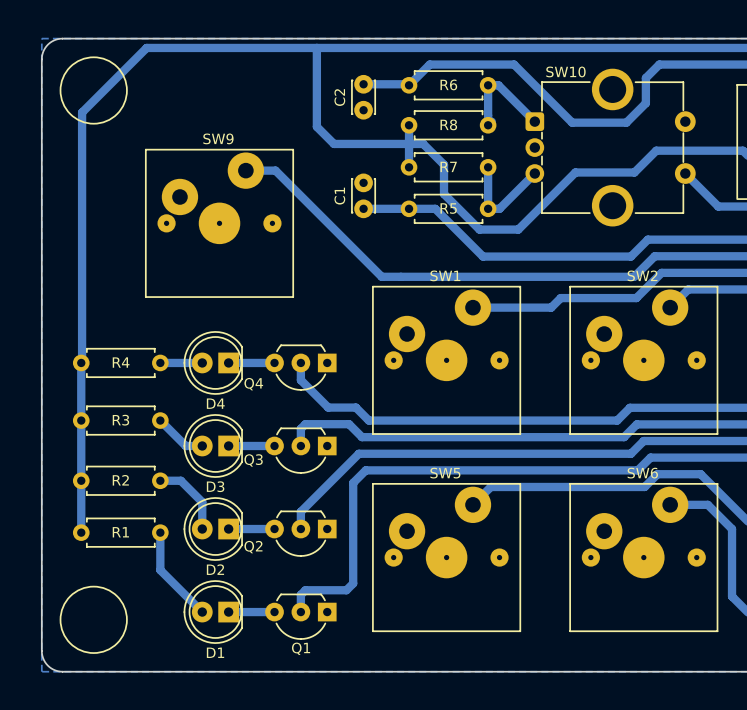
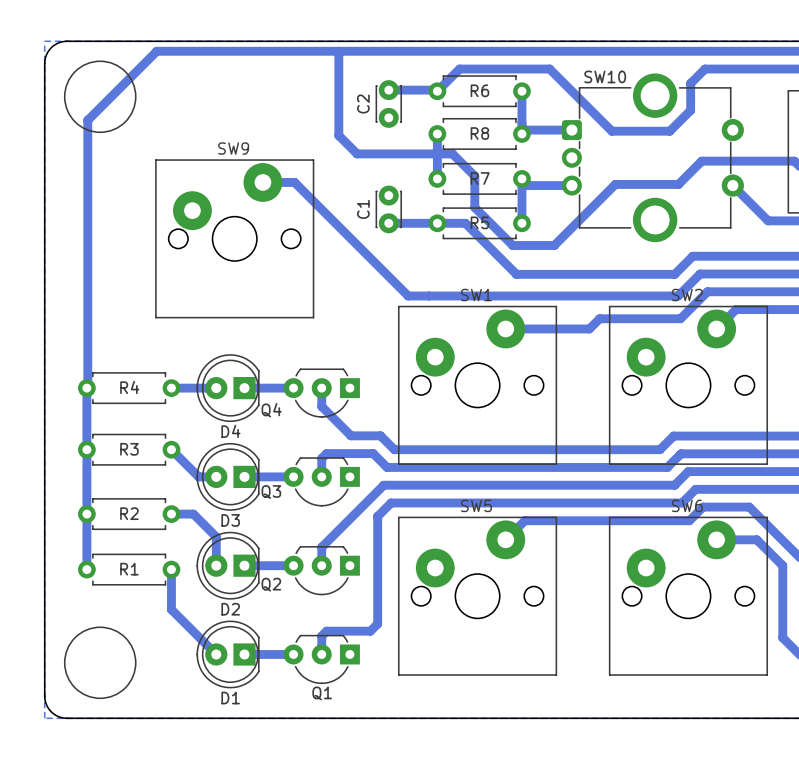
bottom track: (488, 85) (498, 85) (534, 121) -> (525, 130) (571, 130)
SW9 footprint: [145, 149, 294, 298] -> [155, 159, 315, 319]
bottom track: (534, 173) (499, 208) (488, 208) -> (571, 185) (528, 185) (521, 178)
SW1 footprint: [372, 286, 521, 435] -> [398, 305, 558, 465]
SW2 footprint: [569, 286, 719, 435] -> [608, 305, 768, 465]
SW5 footprint: [372, 483, 521, 632] -> [398, 516, 558, 676]
SW6 footprint: [569, 483, 719, 632] -> [608, 516, 768, 676]

